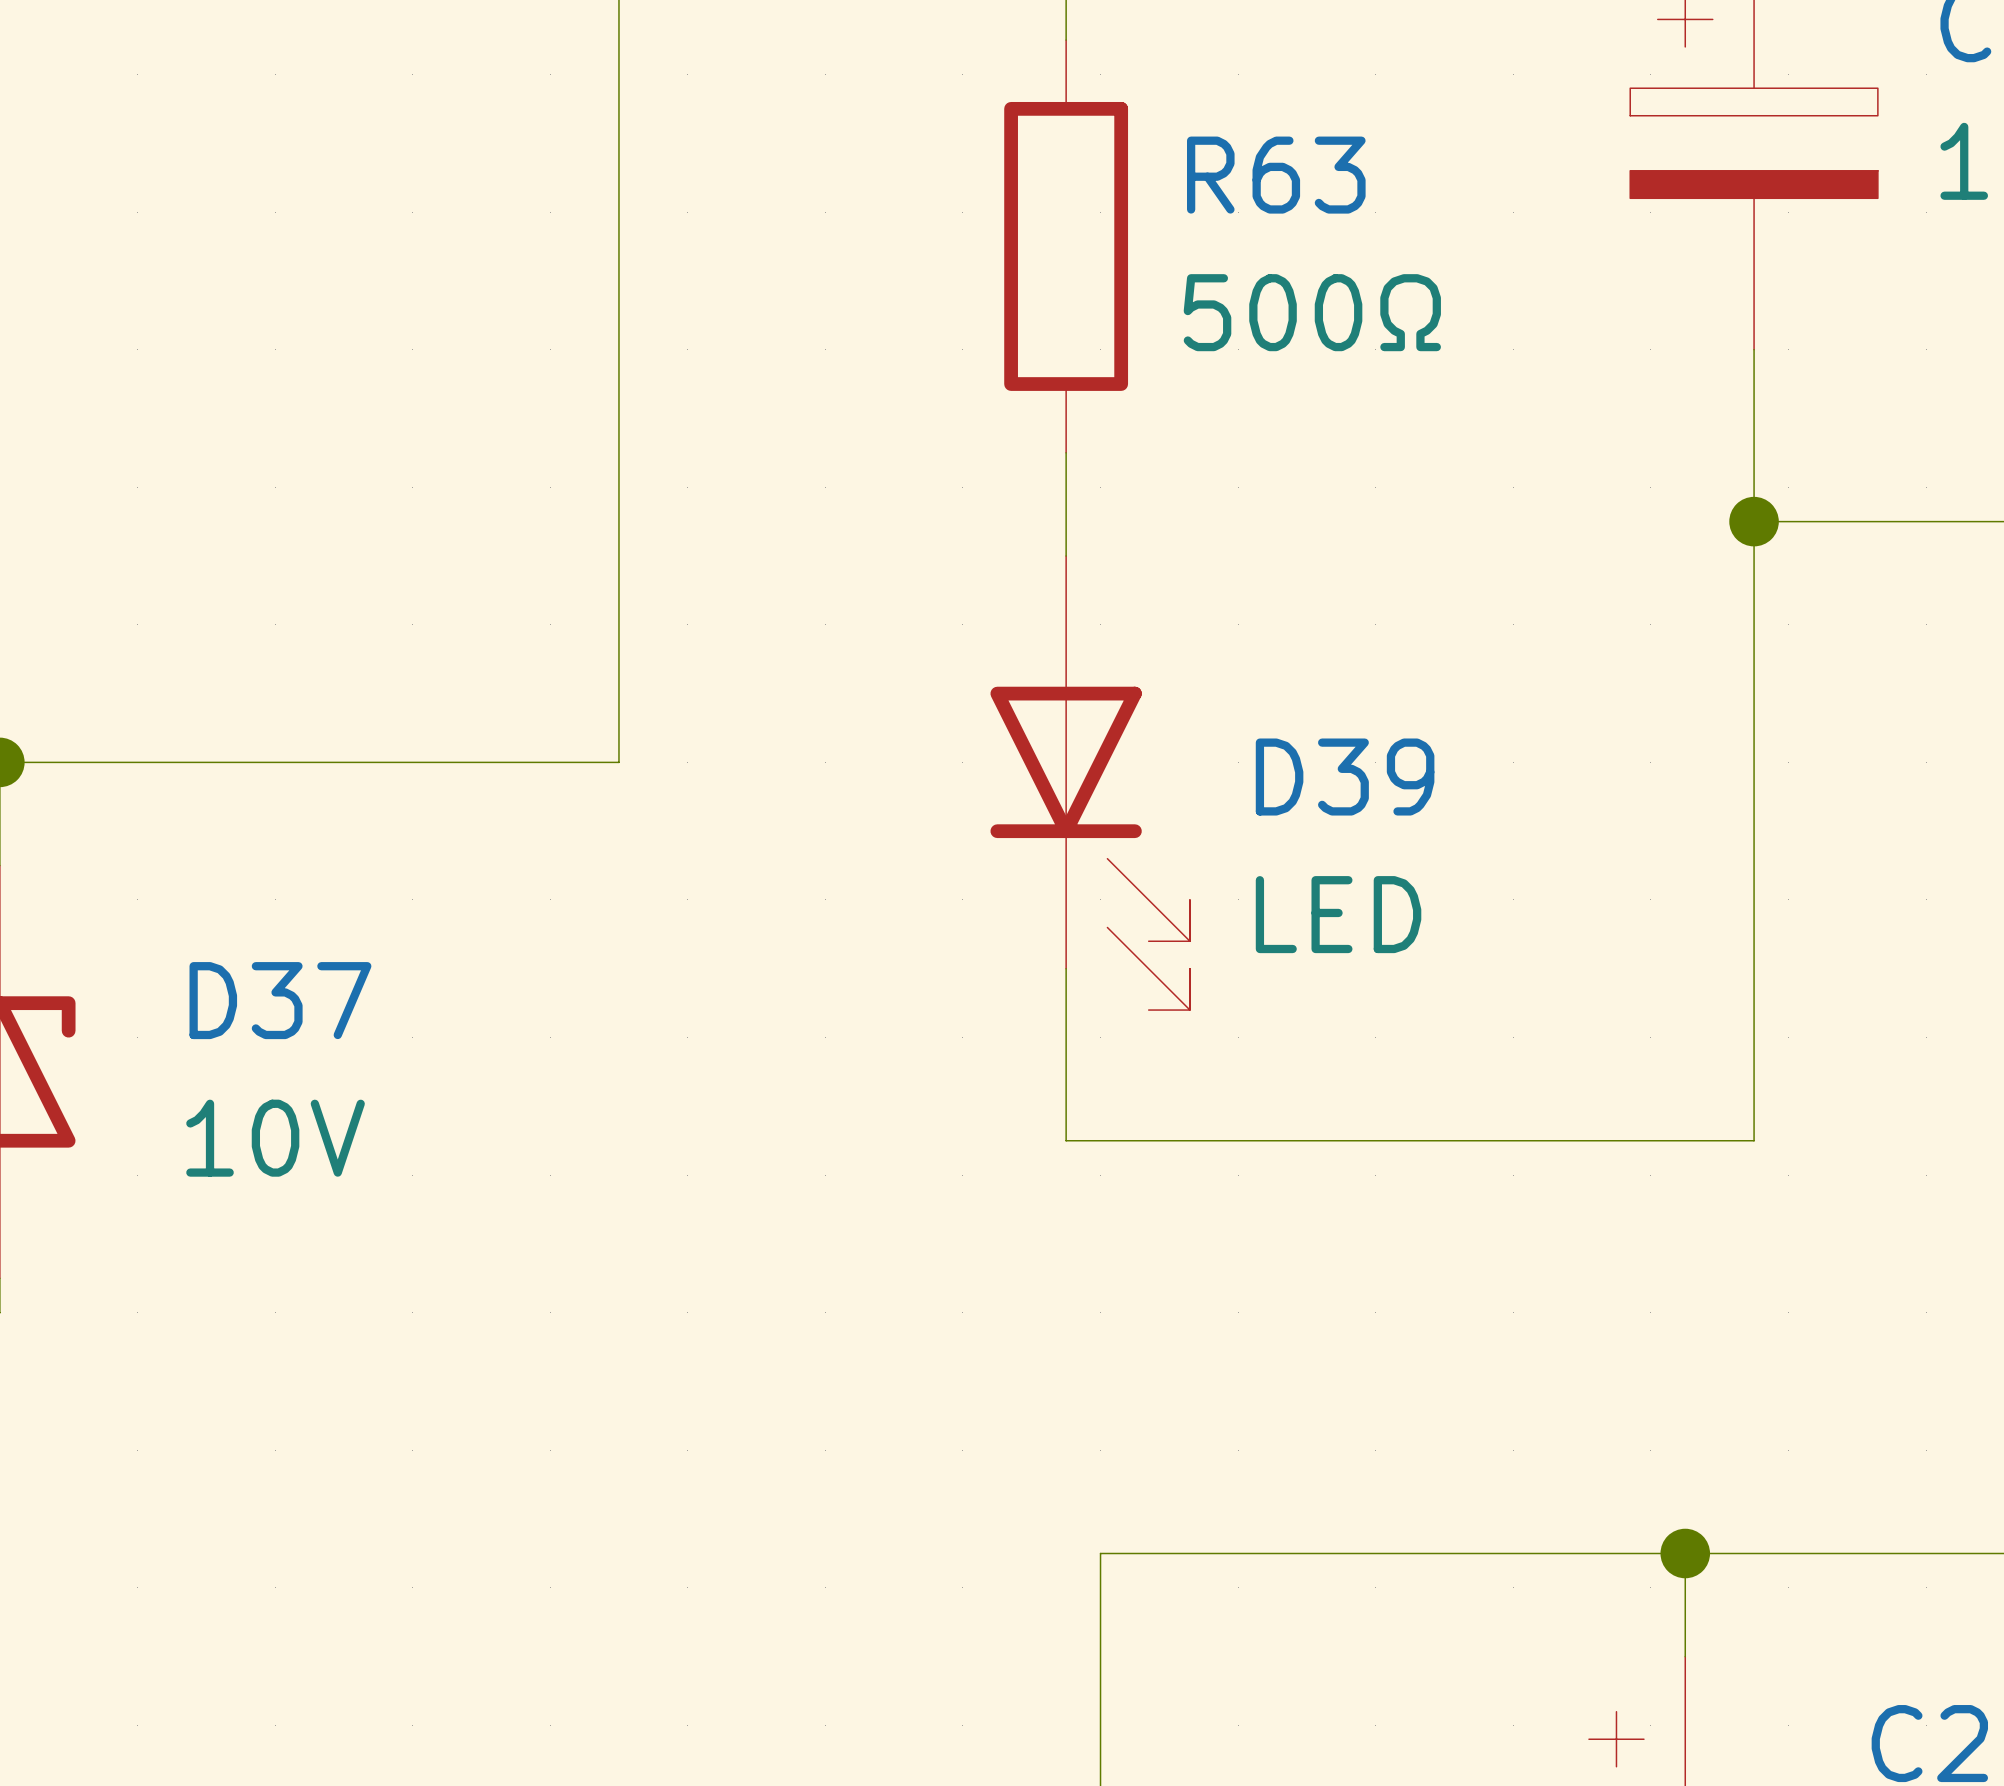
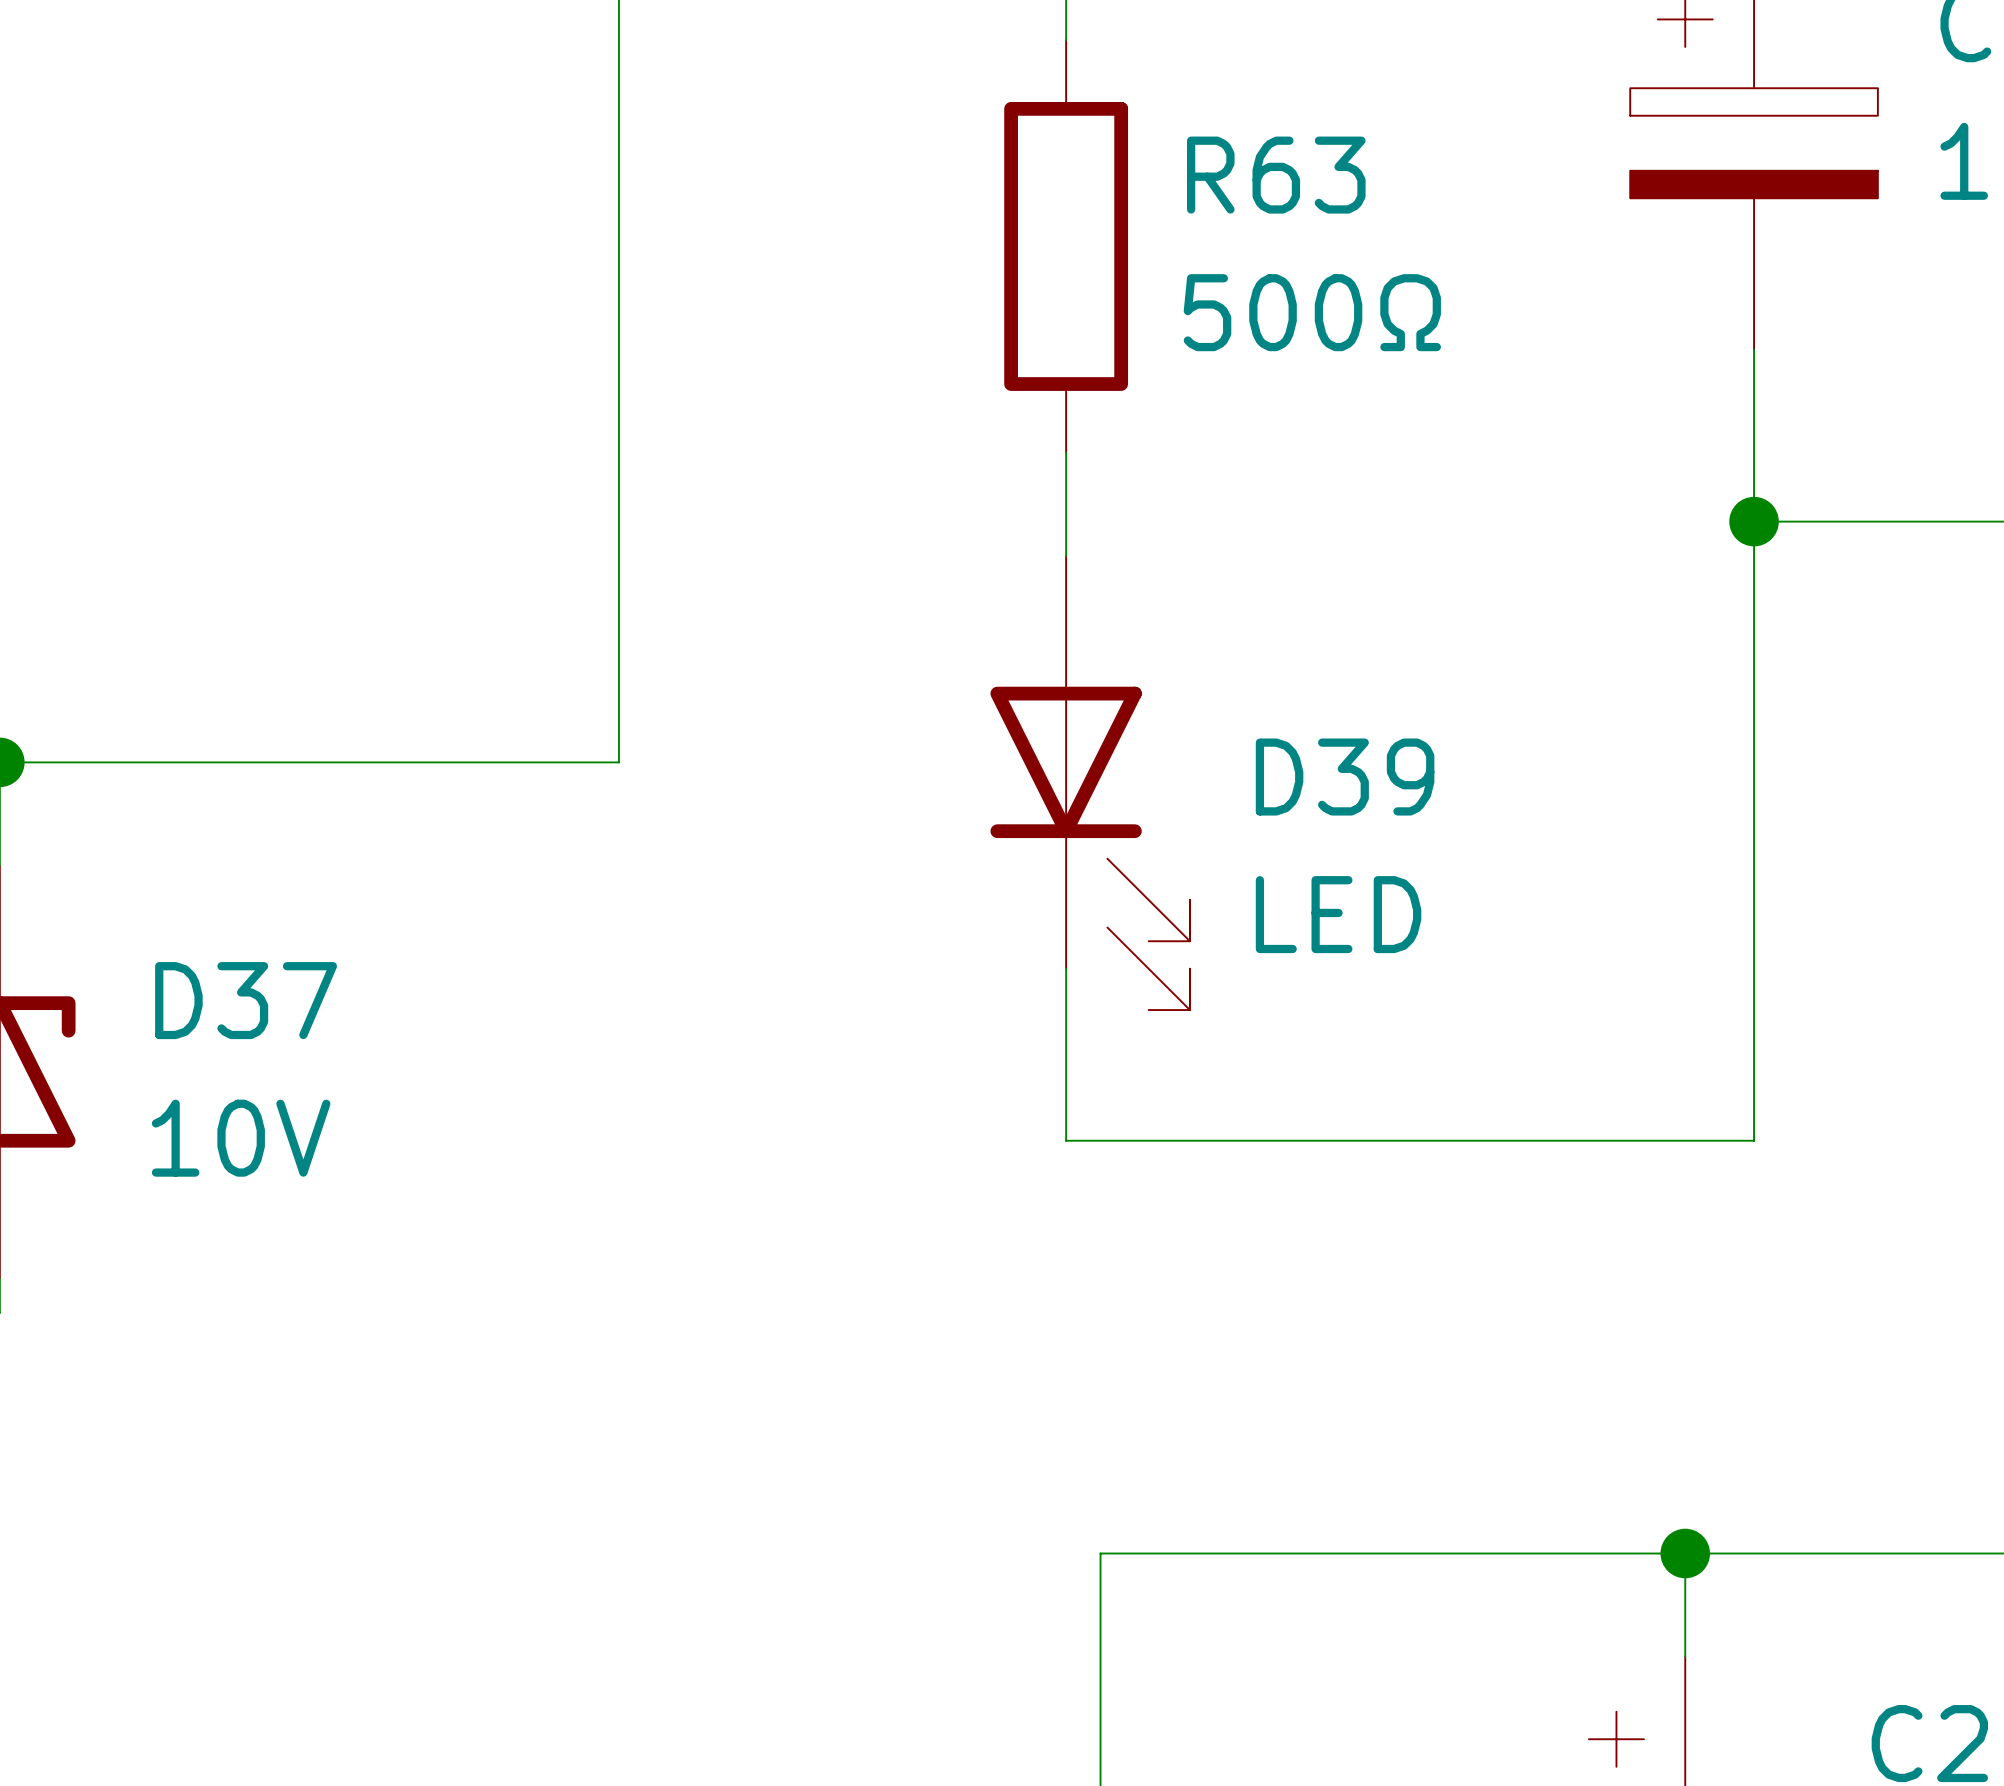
D37 name position: D37 (280, 1000) -> D37 (246, 1000)
D37 value position: 10V (275, 1138) -> 10V (241, 1138)

